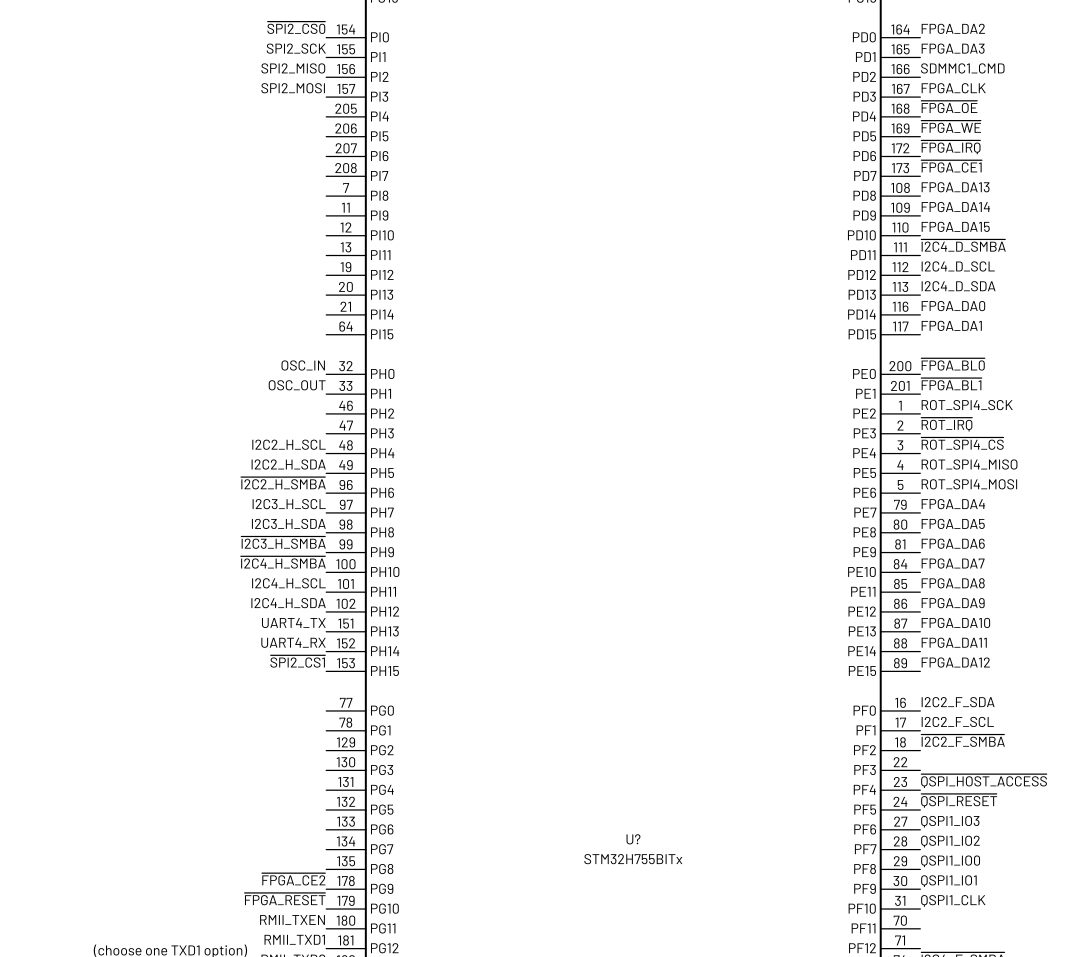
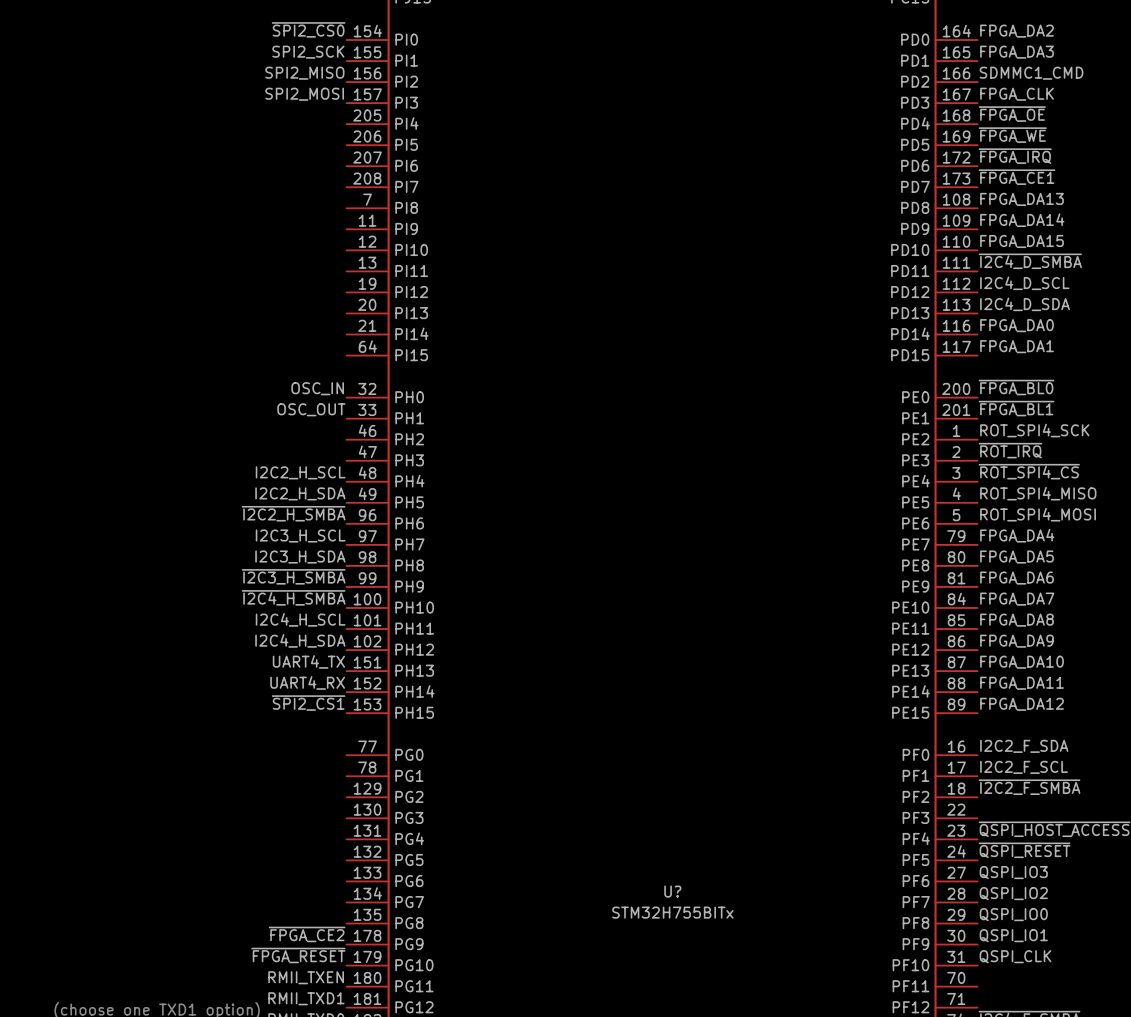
label: QSPI1_IO3 (950, 821) -> QSPI_IO3 (1013, 872)
label: QSPI1_IO2 (950, 841) -> QSPI_IO2 (1013, 893)
label: QSPI1_IO0 (950, 861) -> QSPI_IO0 (1013, 914)
label: QSPI1_IO1 (948, 881) -> QSPI_IO1 (1013, 935)
label: QSPI1_CLK (953, 900) -> QSPI_CLK (1015, 956)

